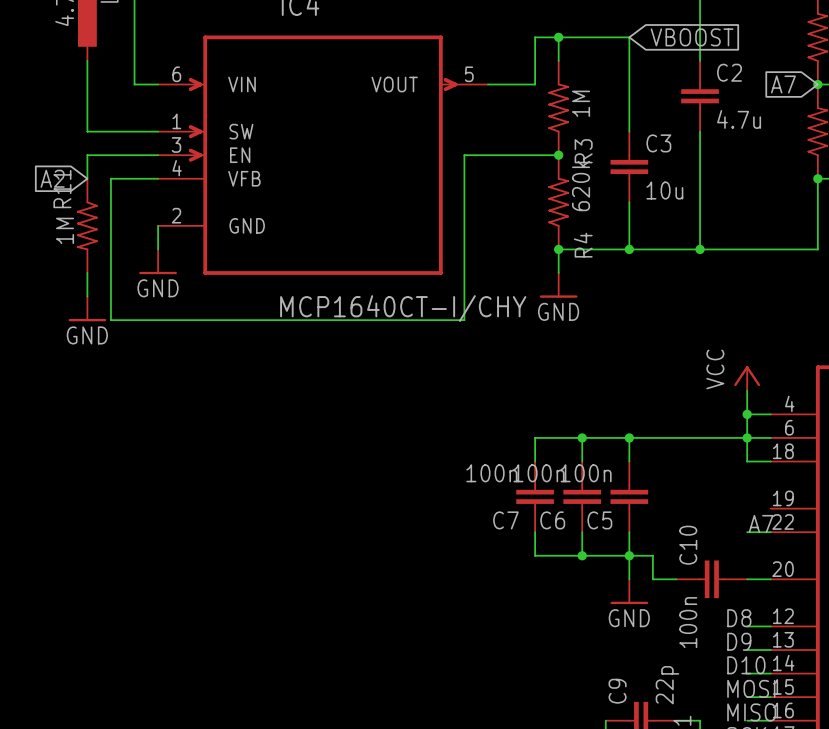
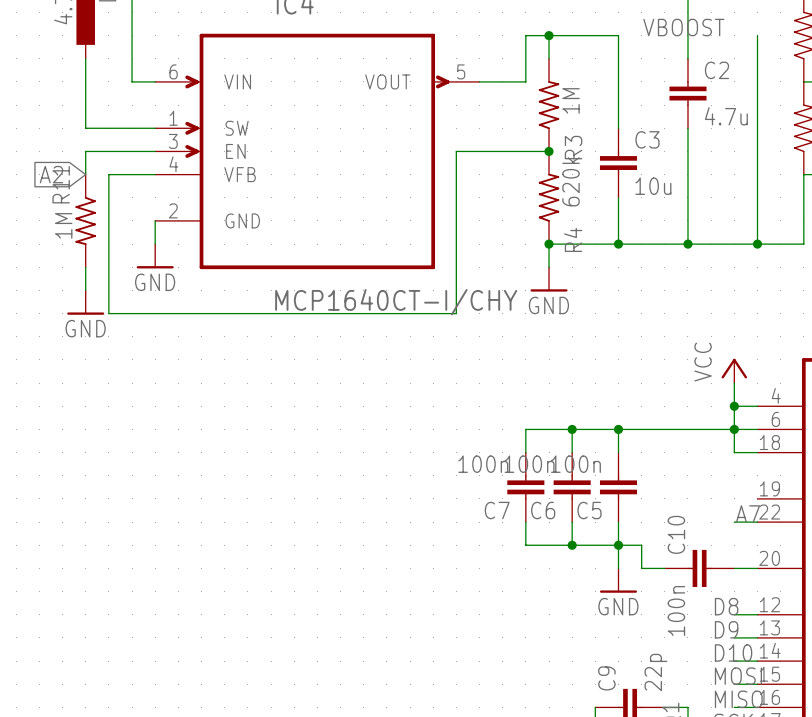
label: none -> VBOOST (683, 27)
global label: VBOOST (692, 37) -> none
wire: none -> (757, 35) (757, 244)
global label: A7 (783, 84) -> none
junction: (817, 84) -> none
junction: (817, 178) -> none
junction: none -> (757, 244)

